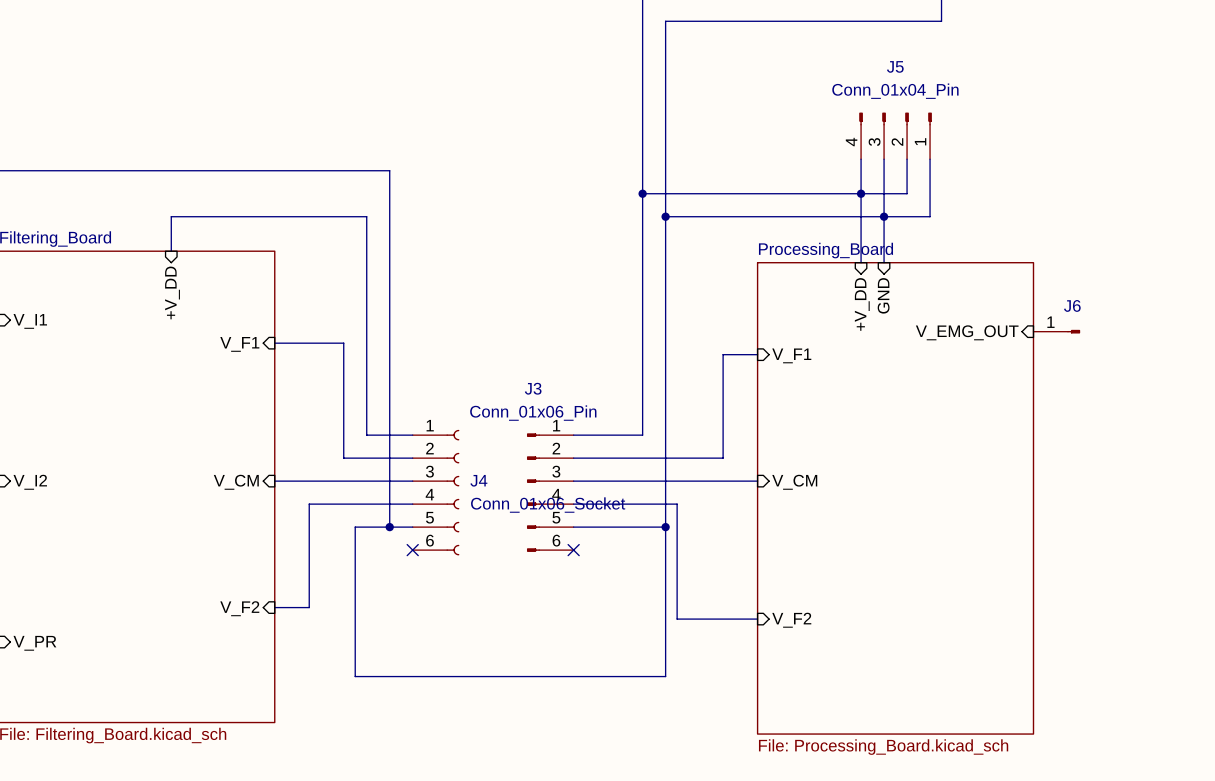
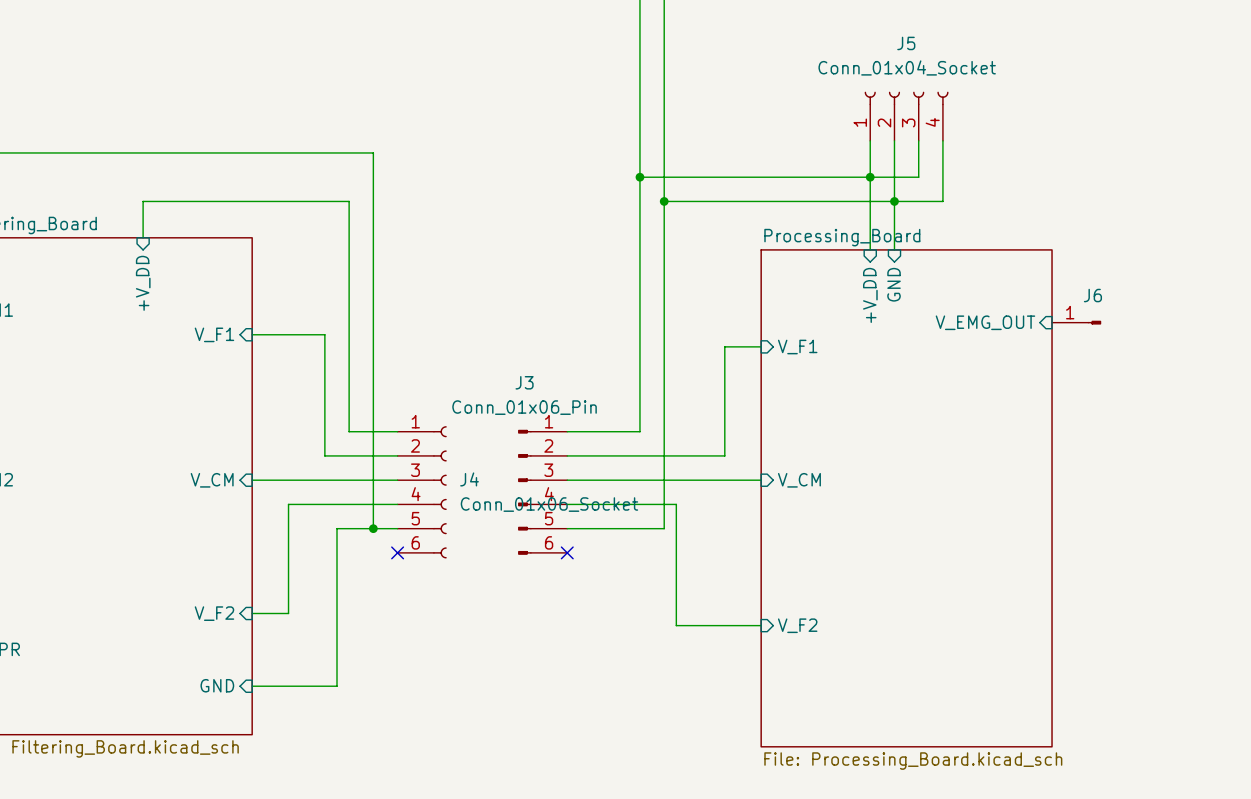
J5 value: Conn_01x04_Pin (895, 91) -> Conn_01x04_Socket (907, 67)
J5 symbol: [859, 112, 932, 160] -> [864, 91, 949, 141]
wire: (665, 527) (665, 676) (355, 676) -> (252, 686) (337, 686)
junction: (665, 527) -> none
sheet pin: none -> GND (217, 685)

